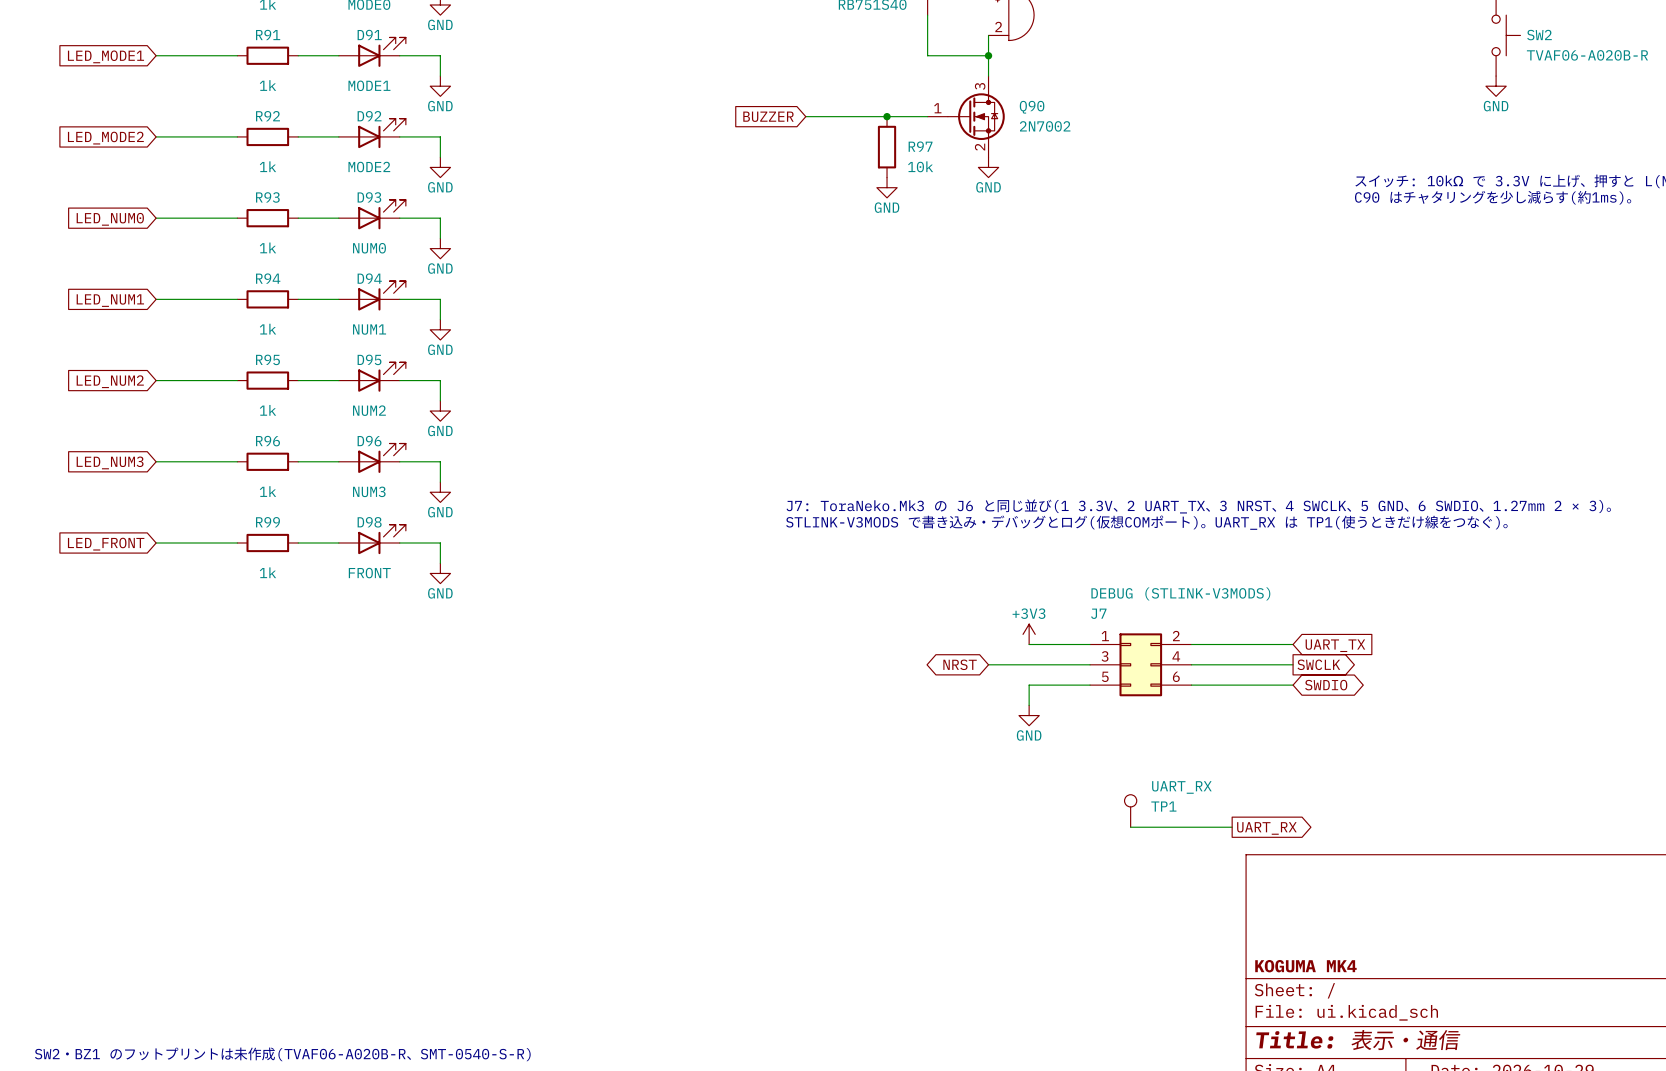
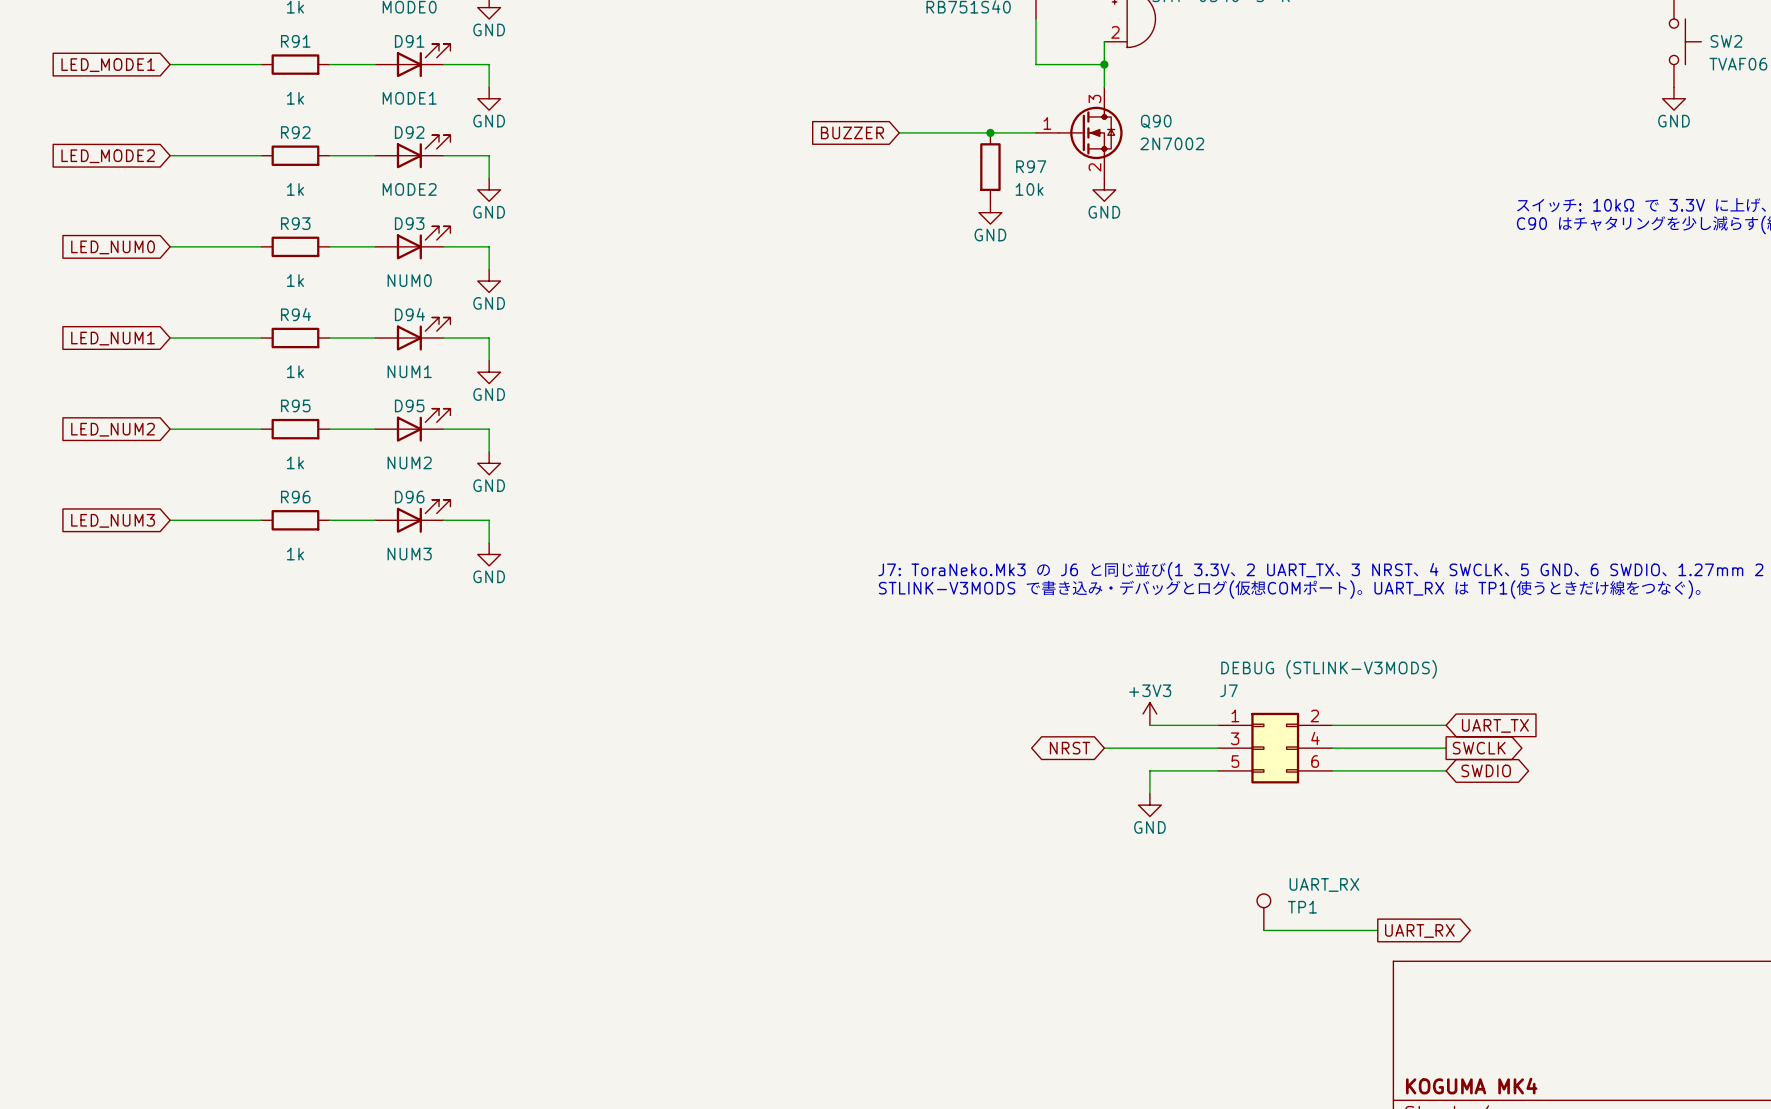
D98: FRONT (372, 539) -> none
wire: (156, 542) (237, 542) -> none
R99: 1k (267, 542) -> none
wire: (298, 542) (338, 542) -> none
wire: (399, 542) (440, 542) (440, 563) -> none
global label: LED_FRONT (106, 544) -> none
power symbol: GND (440, 573) -> none

